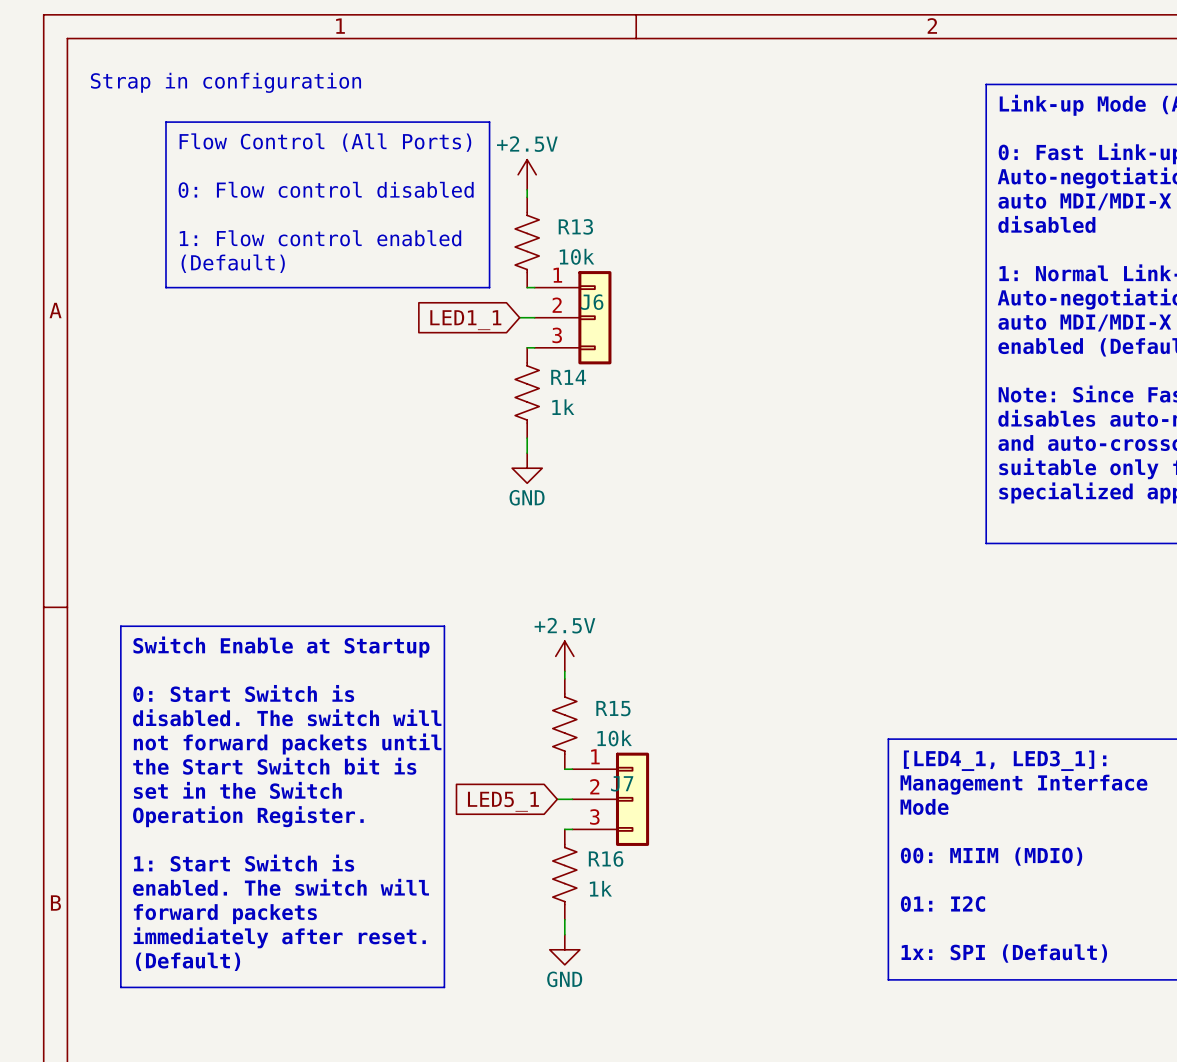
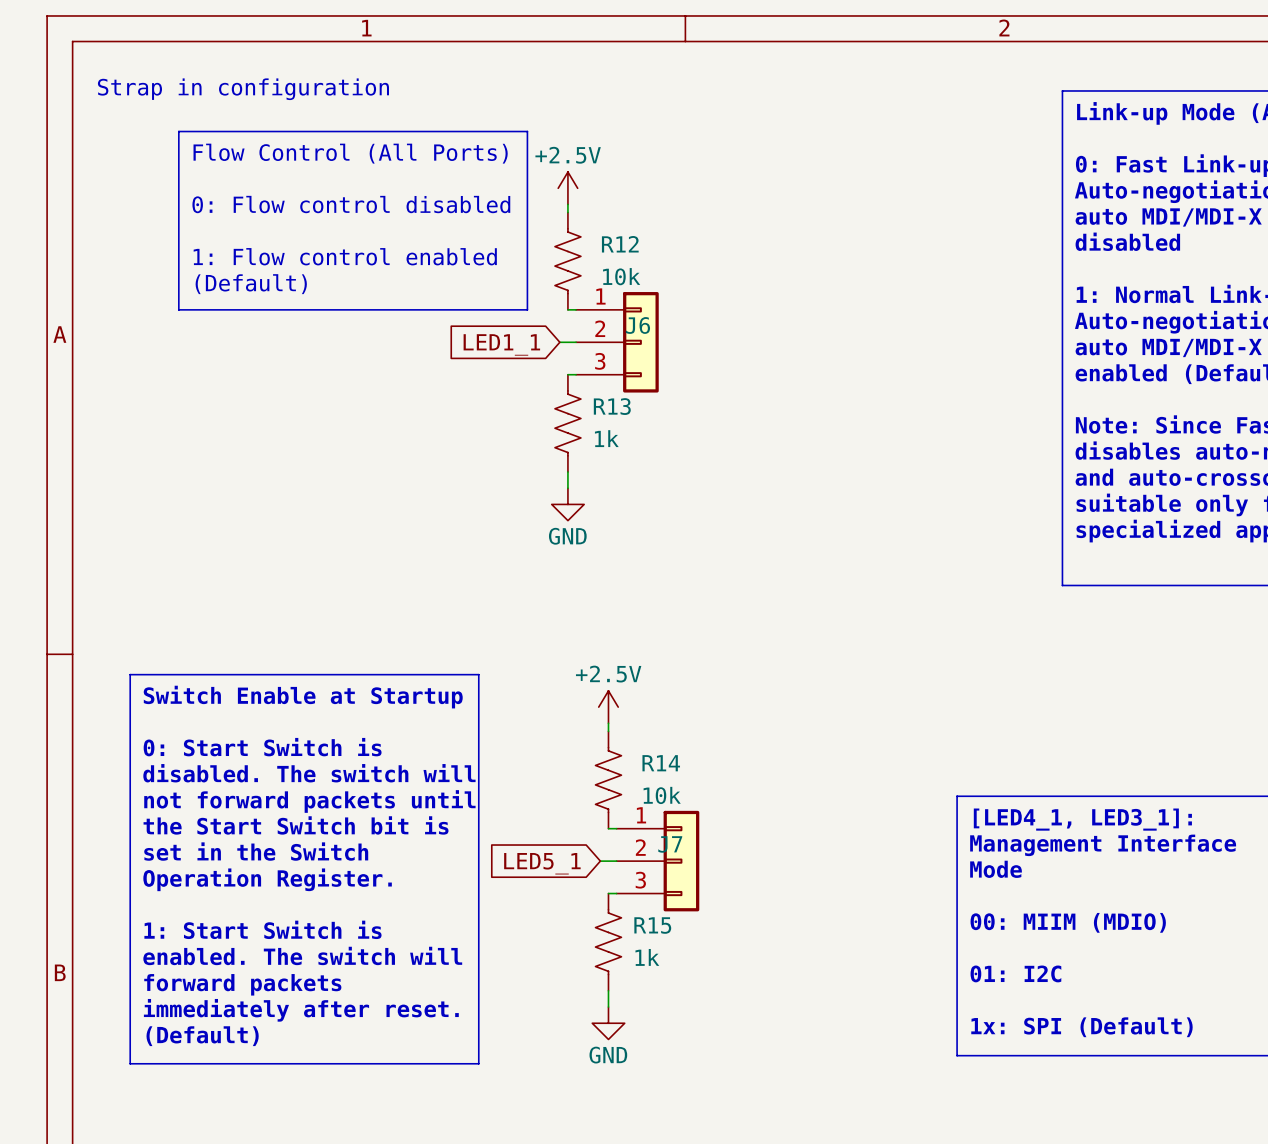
R13 name: R13 (575, 226) -> R12 (620, 244)
R14 name: R14 (568, 377) -> R13 (612, 406)
R15 name: R15 (613, 708) -> R14 (661, 763)
R16 name: R16 (606, 858) -> R15 (652, 925)

